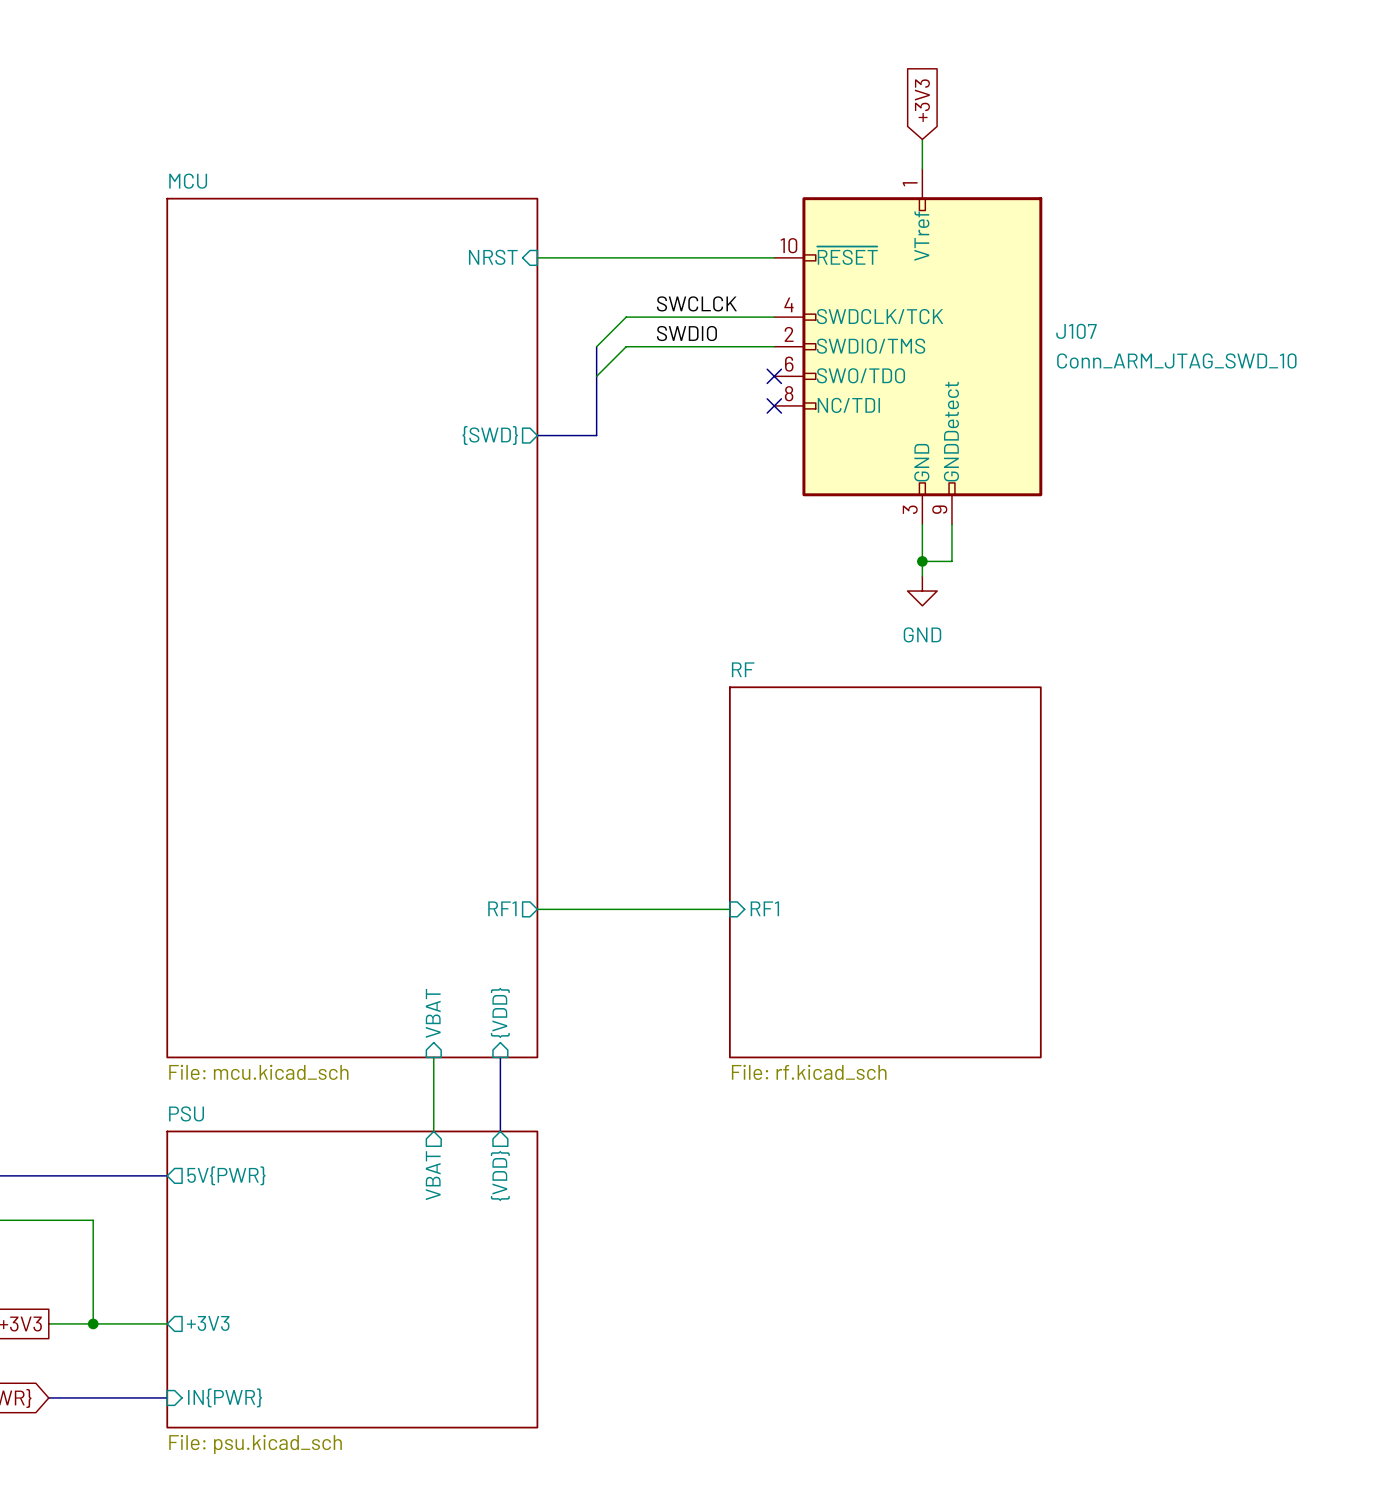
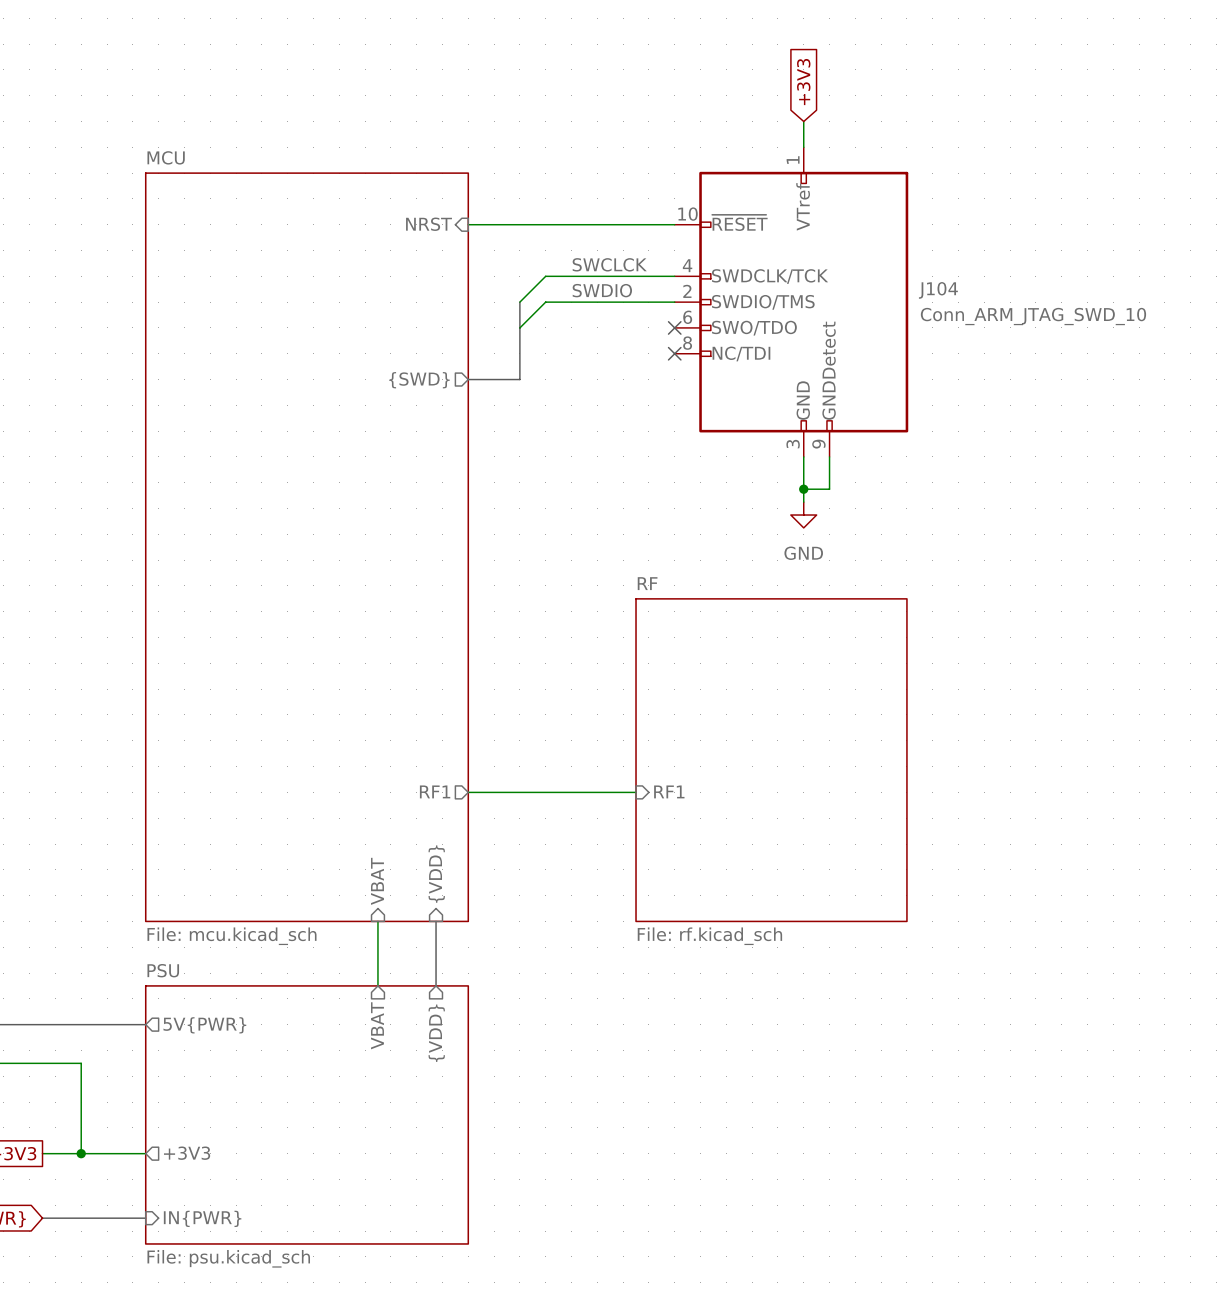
J107 name: J107 (1076, 331) -> J104 (938, 290)

